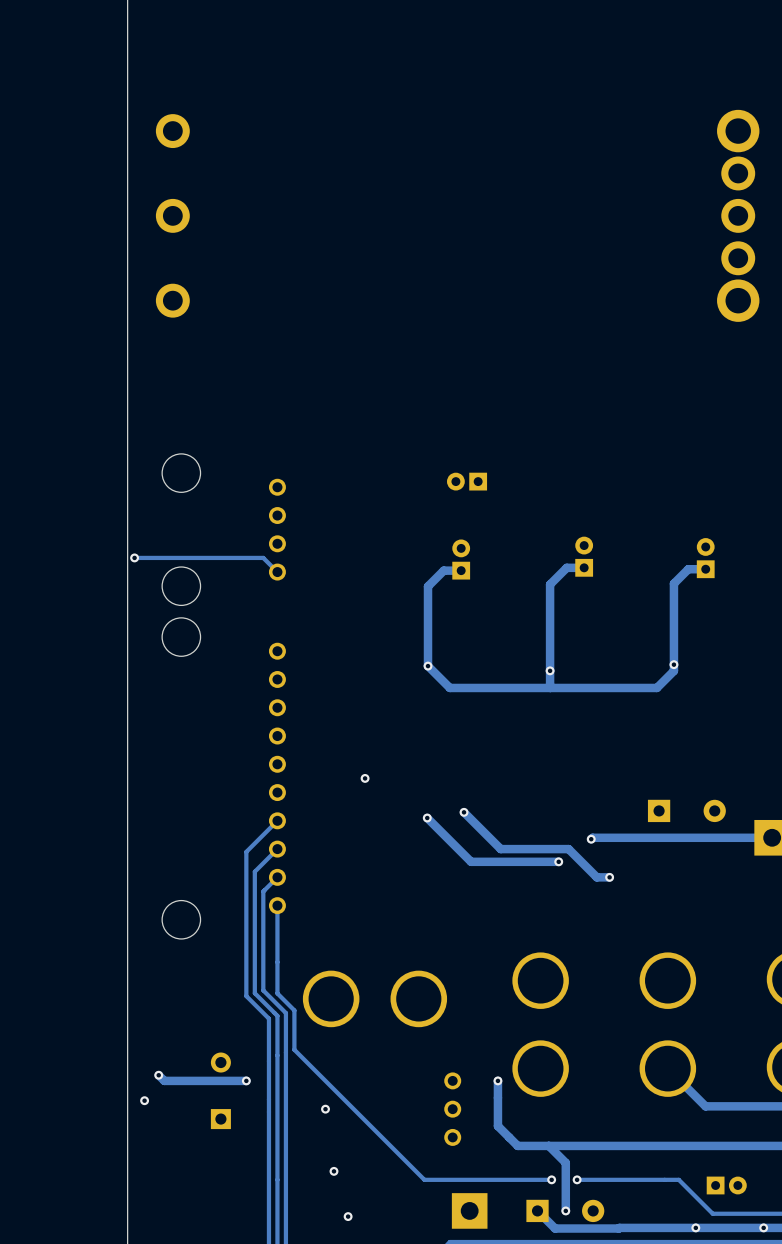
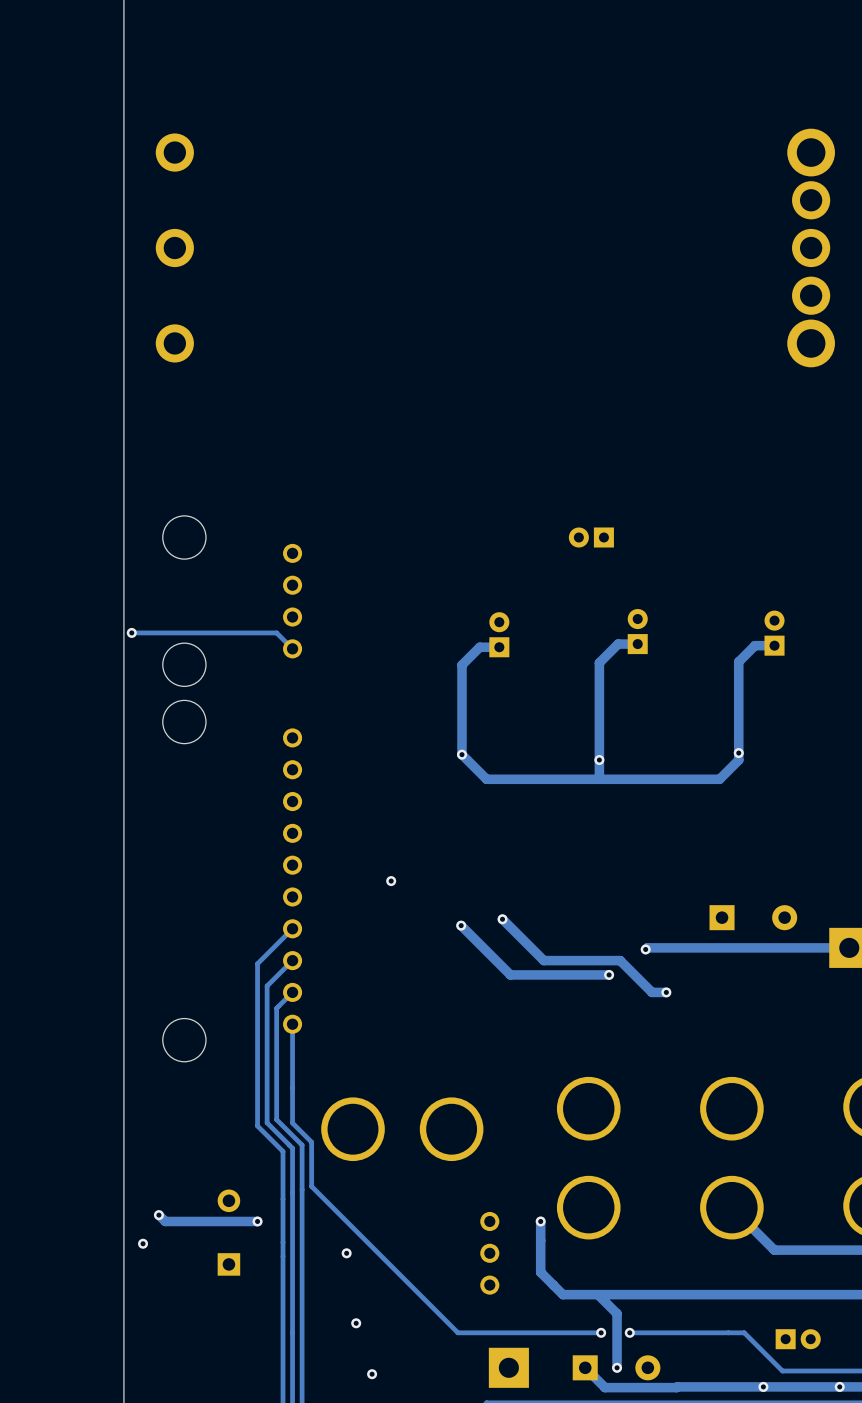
part position: (467, 481) -> (591, 537)

